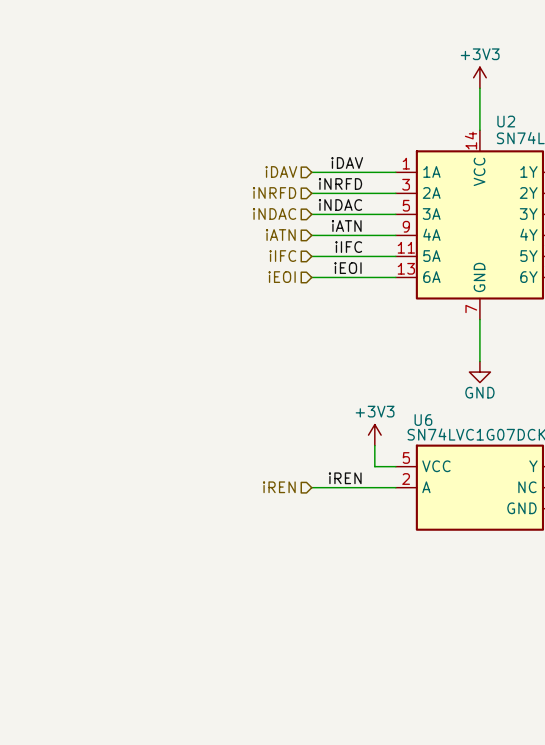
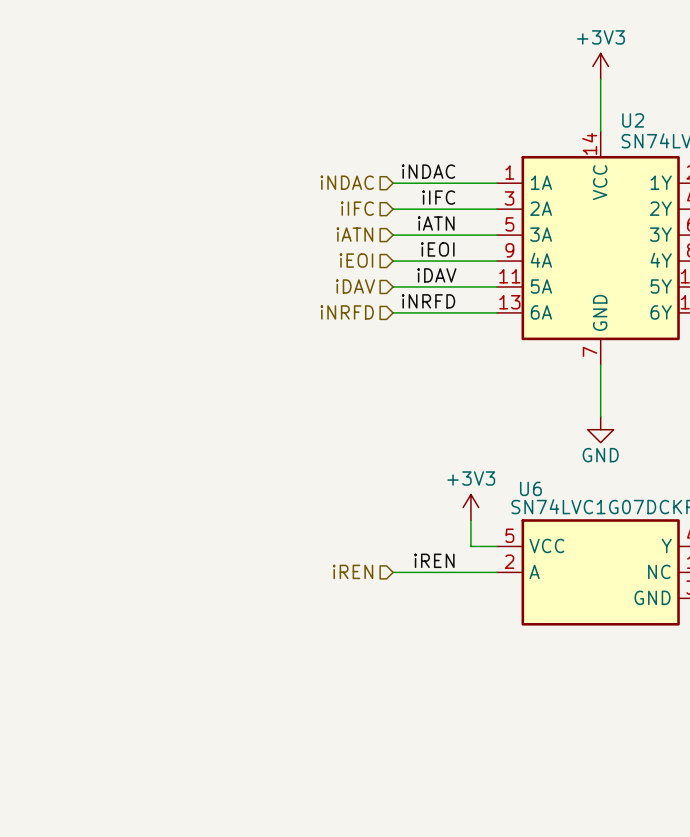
label: iDAV (347, 162) -> iNDAC (428, 171)
hierarchical label: iDAV (281, 171) -> iNDAC (347, 182)
label: iNRFD (340, 184) -> iIFC (438, 197)
hierarchical label: iNRFD (274, 192) -> iIFC (357, 208)
label: iNDAC (340, 205) -> iATN (436, 223)
hierarchical label: iNDAC (274, 214) -> iATN (354, 234)
label: iATN (346, 226) -> iEOI (437, 249)
hierarchical label: iATN (280, 235) -> iEOI (356, 260)
label: iIFC (348, 247) -> iDAV (436, 275)
hierarchical label: iIFC (282, 256) -> iDAV (355, 286)
label: iEOI (347, 268) -> iNRFD (428, 301)
hierarchical label: iEOI (282, 277) -> iNRFD (347, 312)

